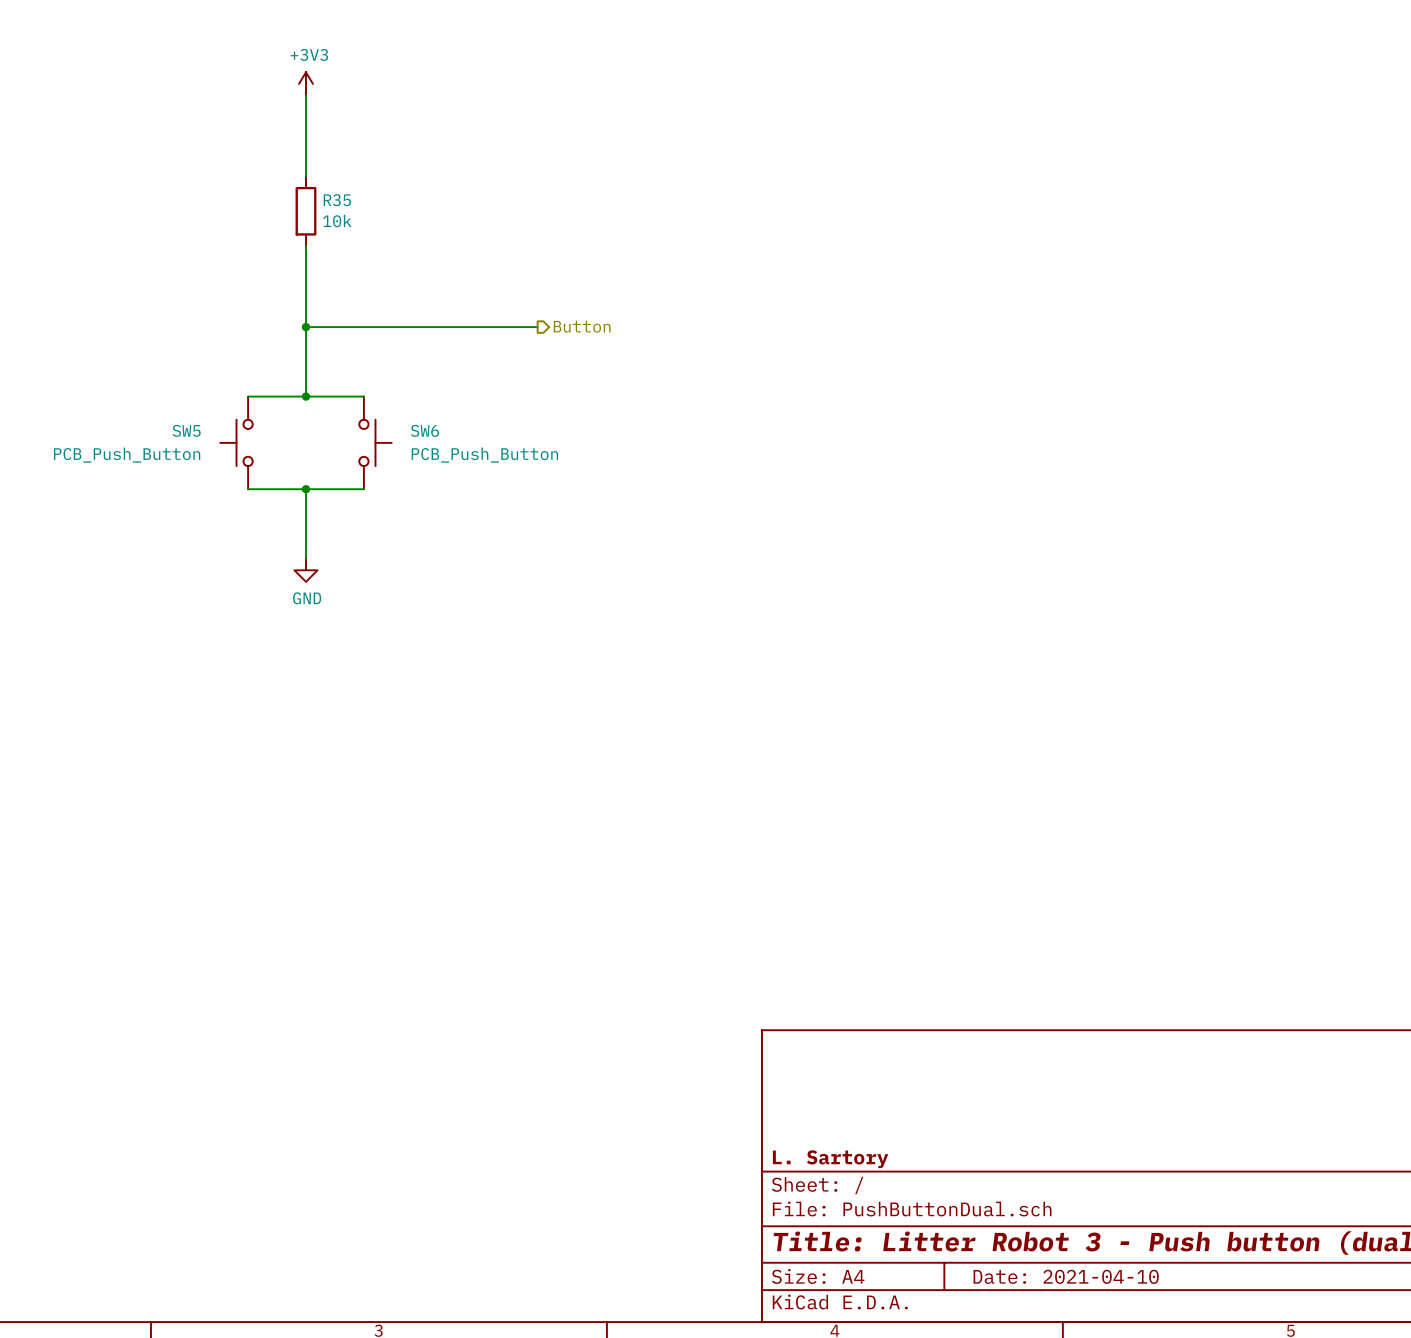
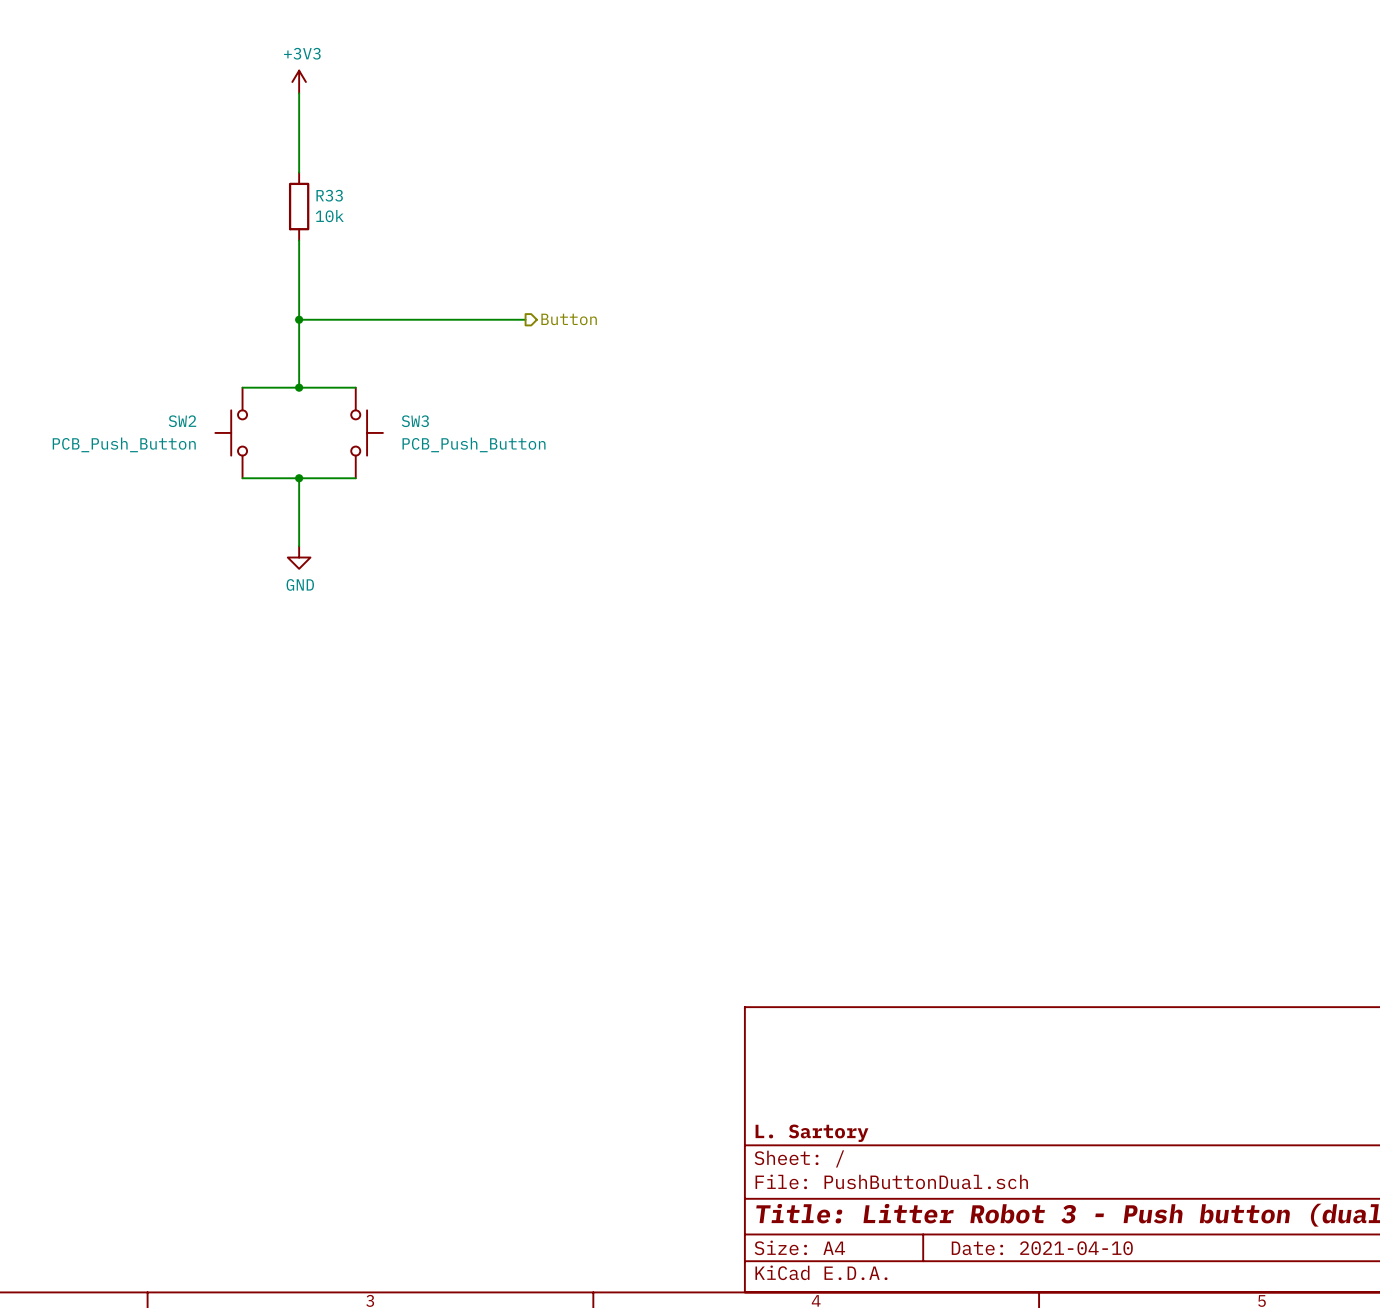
R35 name: R35 (337, 200) -> R33 (329, 195)
SW5 name: SW5 (186, 430) -> SW2 (182, 421)
SW6 name: SW6 (425, 430) -> SW3 (415, 421)

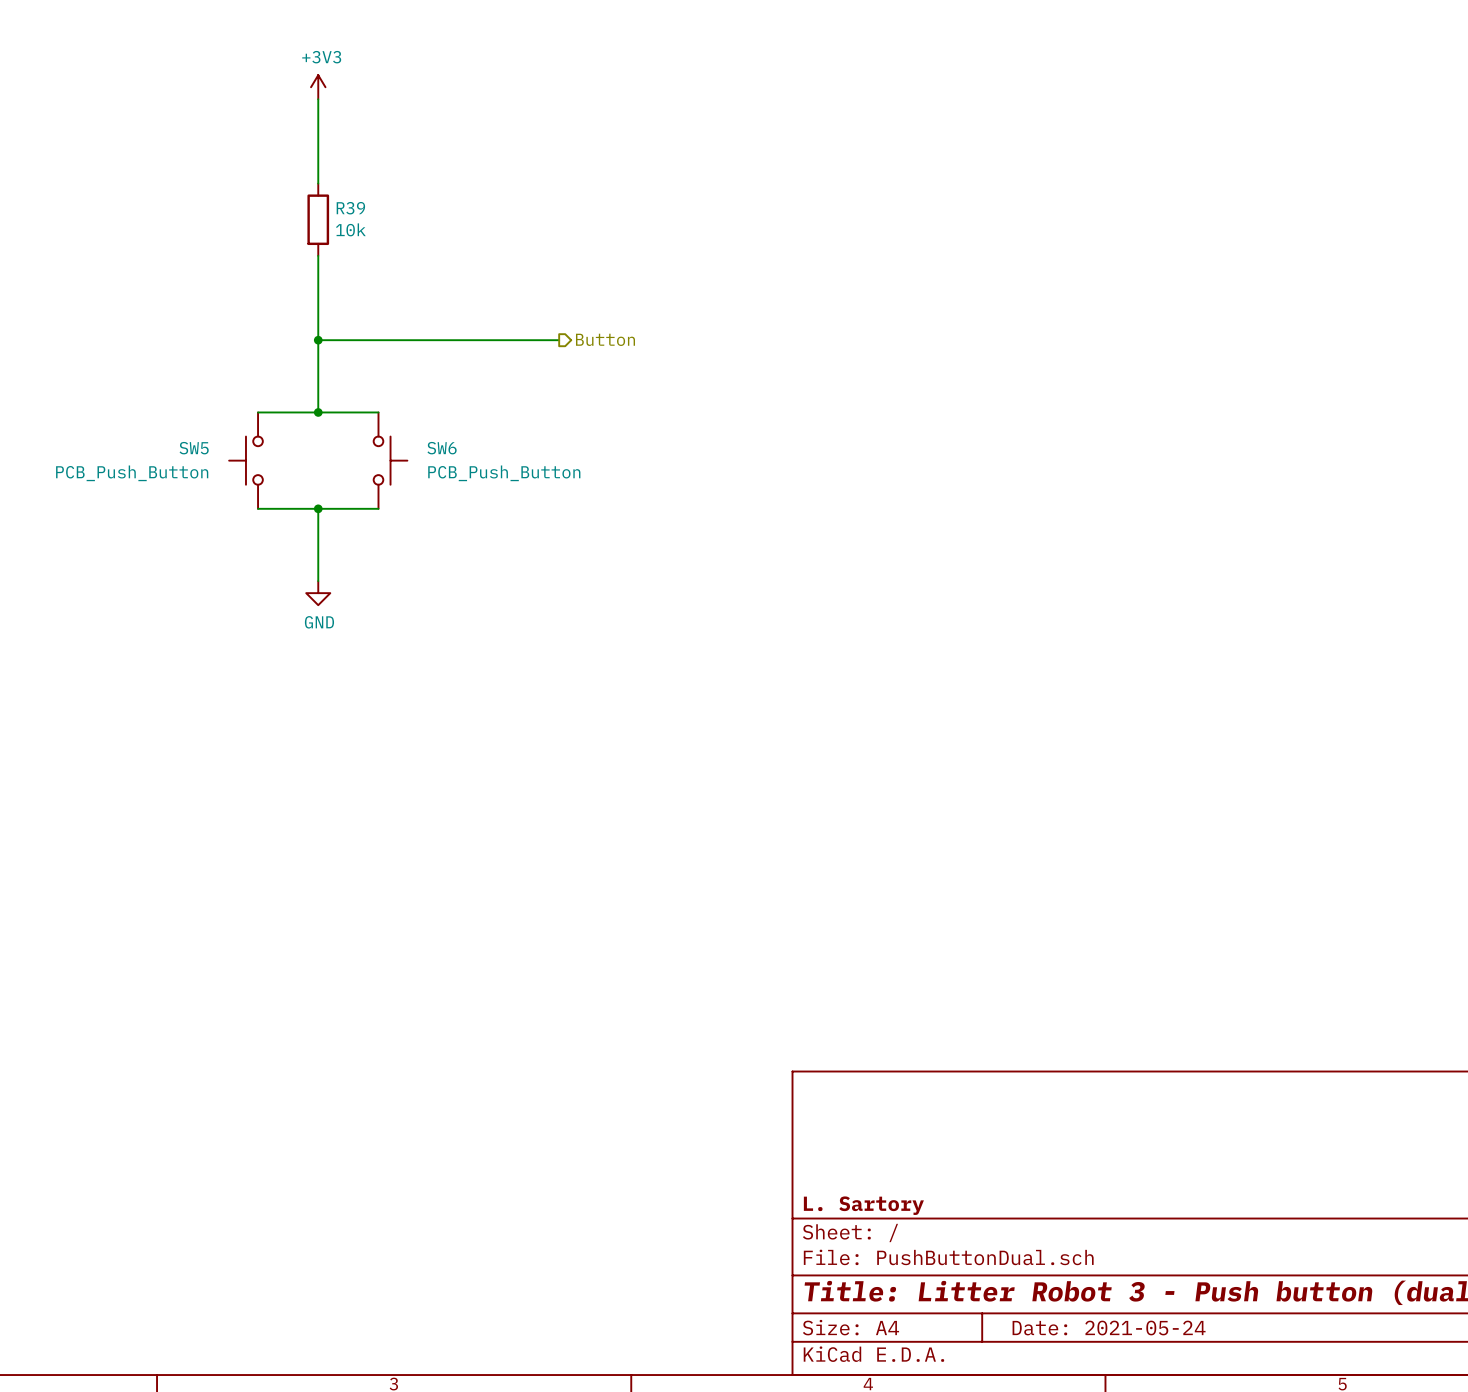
R33 name: R33 (329, 195) -> R39 (350, 208)
SW2 name: SW2 (182, 421) -> SW5 (194, 448)
SW3 name: SW3 (415, 421) -> SW6 (442, 448)
title block: Date: 2021-04-10 (1042, 1248) -> Date: 2021-05-24 (1109, 1328)

